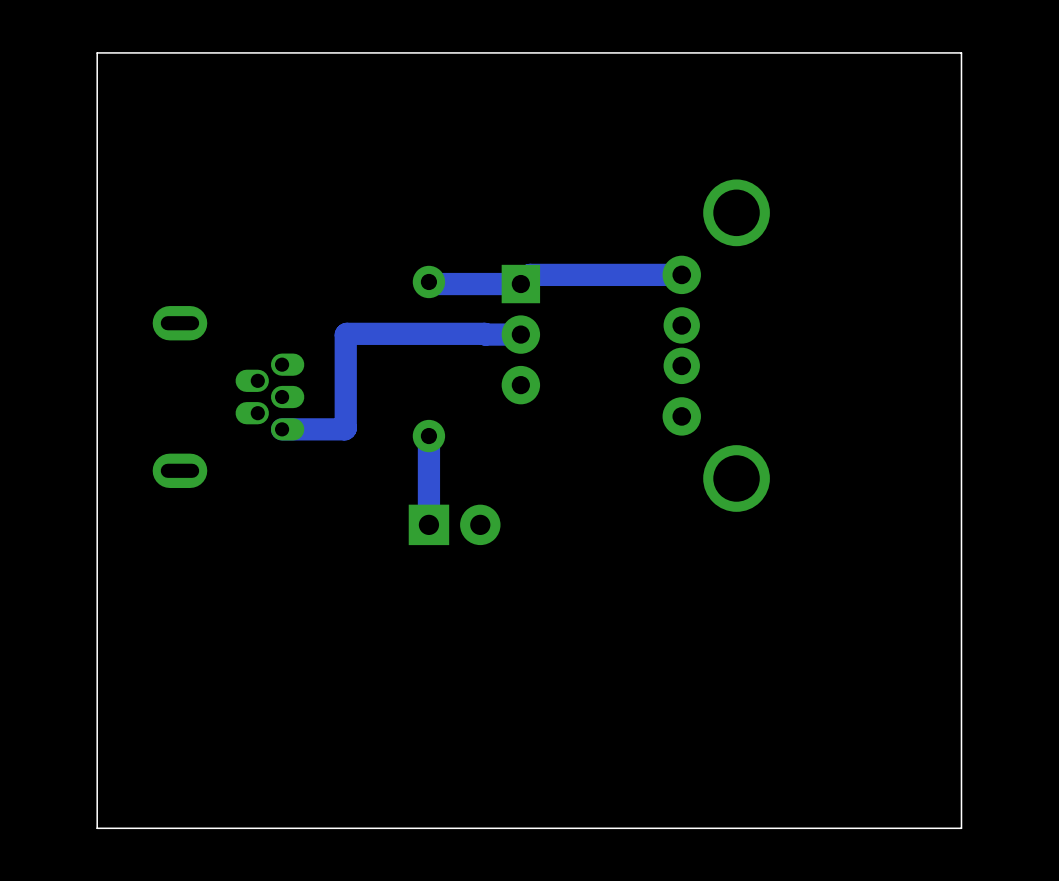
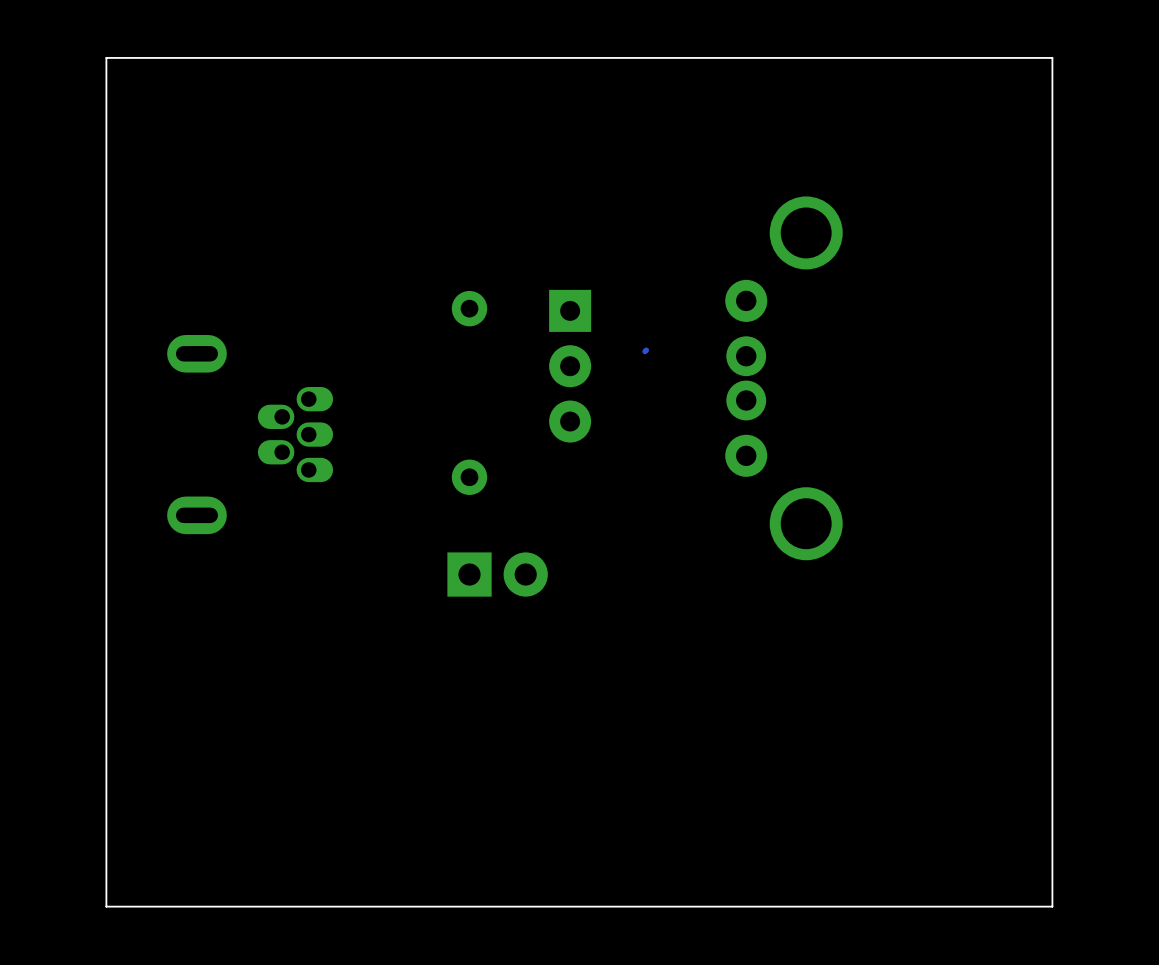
track: (681, 274) (530, 274) (520, 284) (431, 284) (428, 281) -> none
track: none -> (646, 350) (645, 351)
track: (520, 334) (346, 333) (345, 428) (282, 429) -> none
track: (428, 436) (428, 524) -> none

